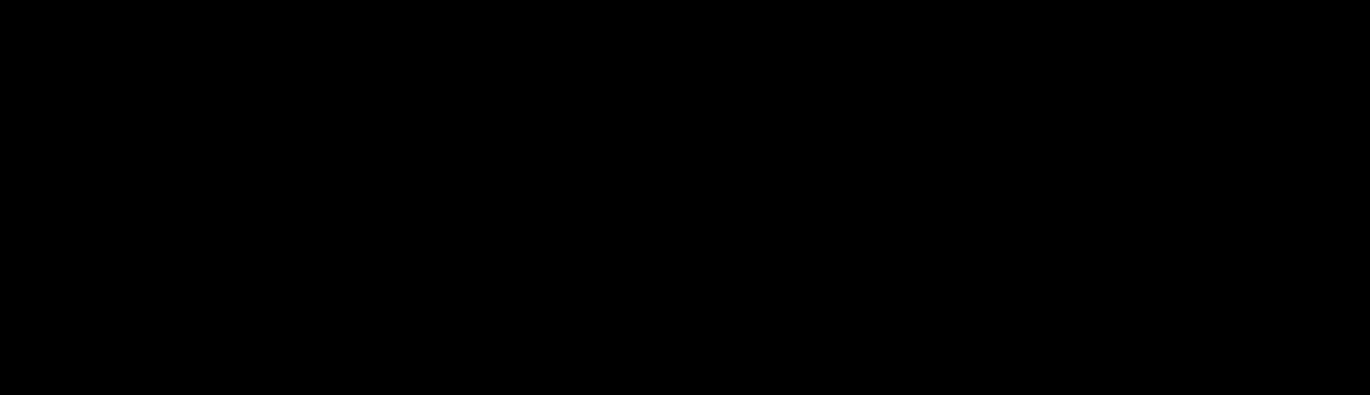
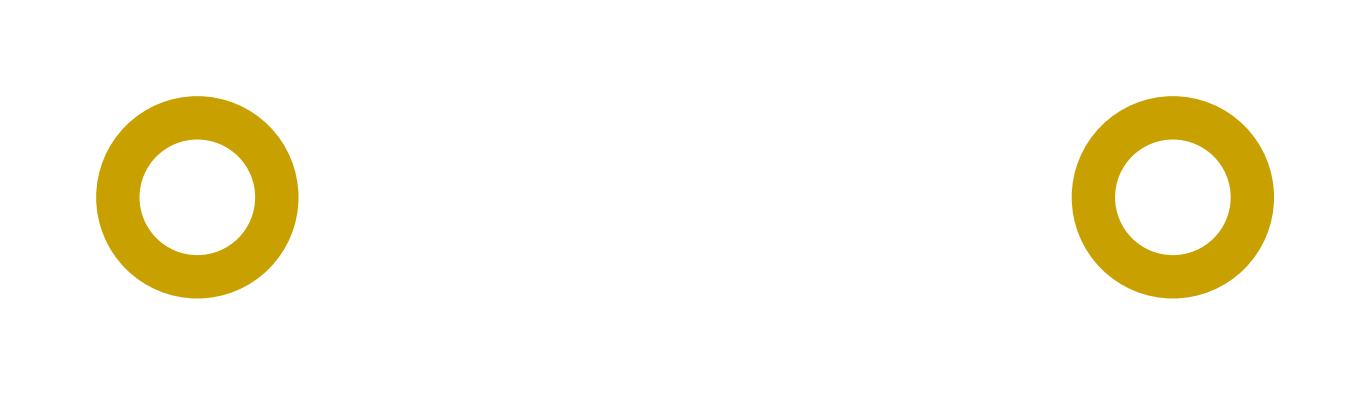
part: none -> (197, 197)
part: none -> (1172, 197)

